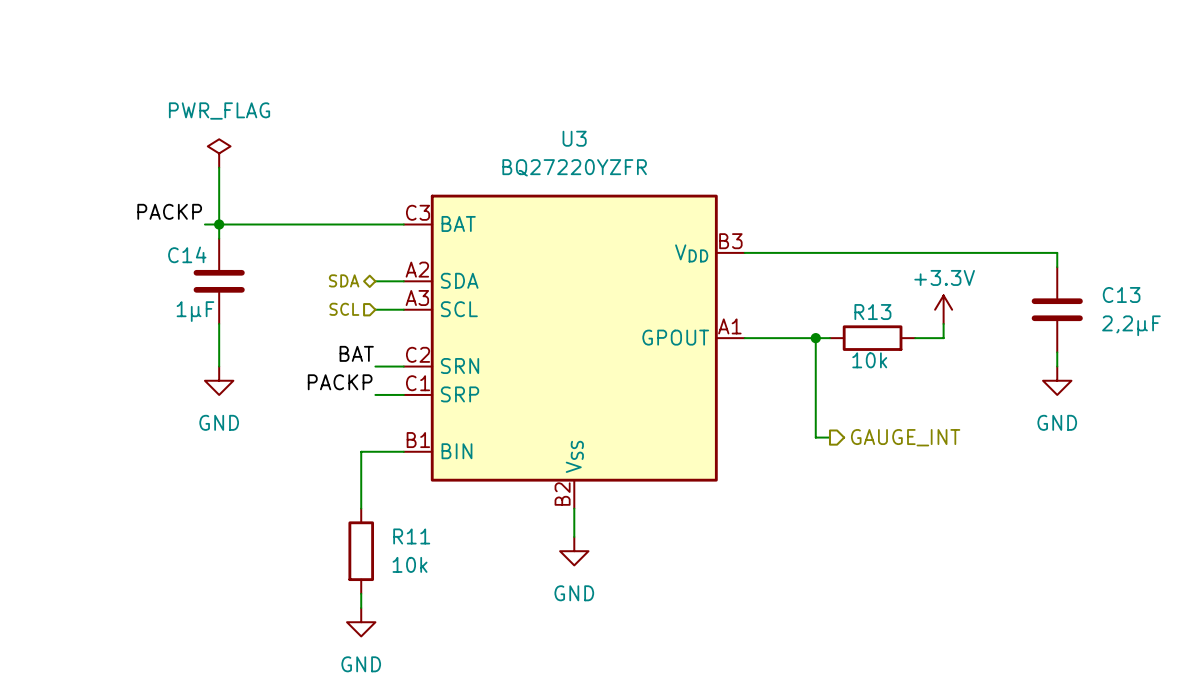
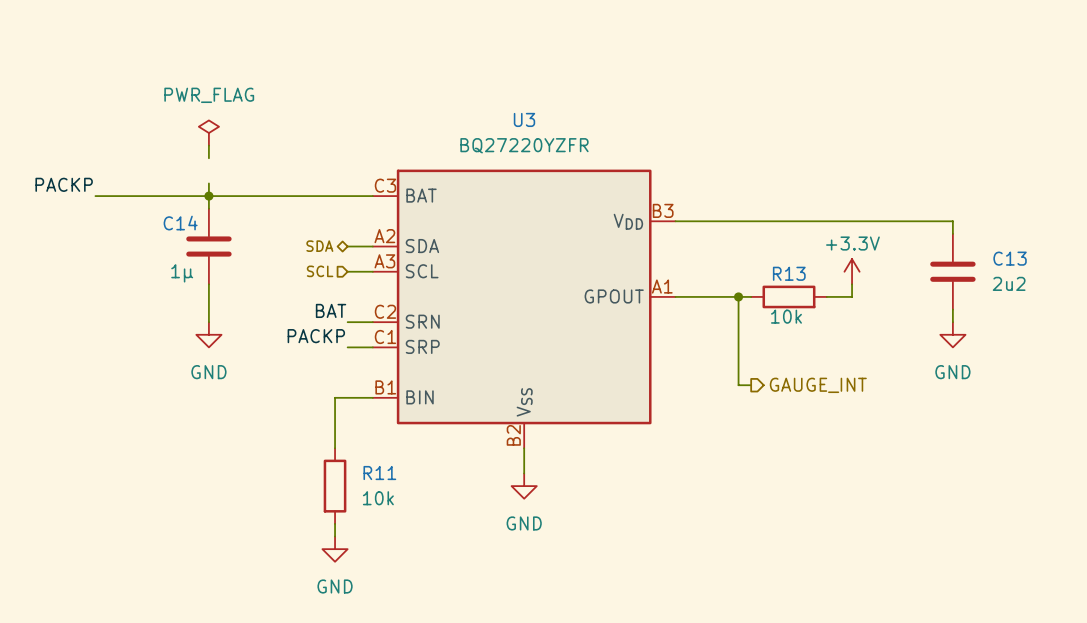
wire: (219, 181) (219, 210) -> none
label position: PACKP (169, 211) -> PACKP (64, 184)
wire: none -> (95, 196) (196, 196)
C14 value: 1µF (195, 311) -> 1µ (182, 273)
C13 value: 2,2µF (1131, 325) -> 2u2 (1009, 283)

